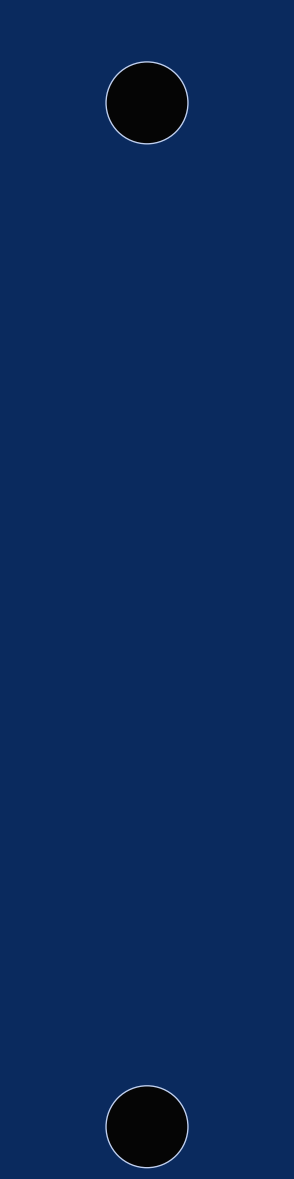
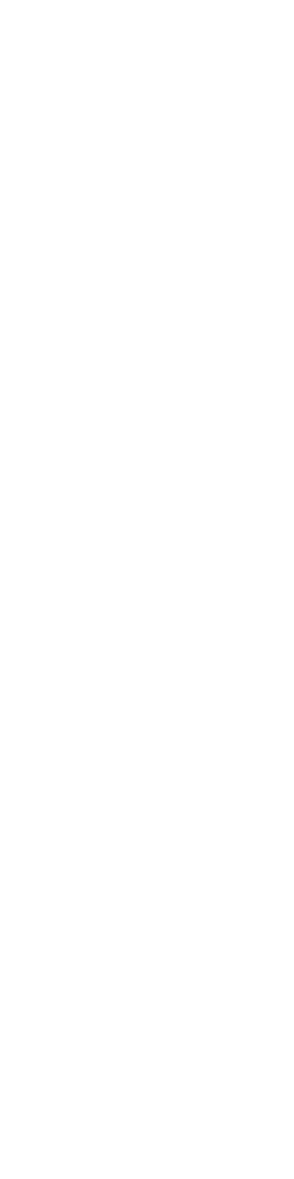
part: (146, 102) -> none
part: (146, 1126) -> none

